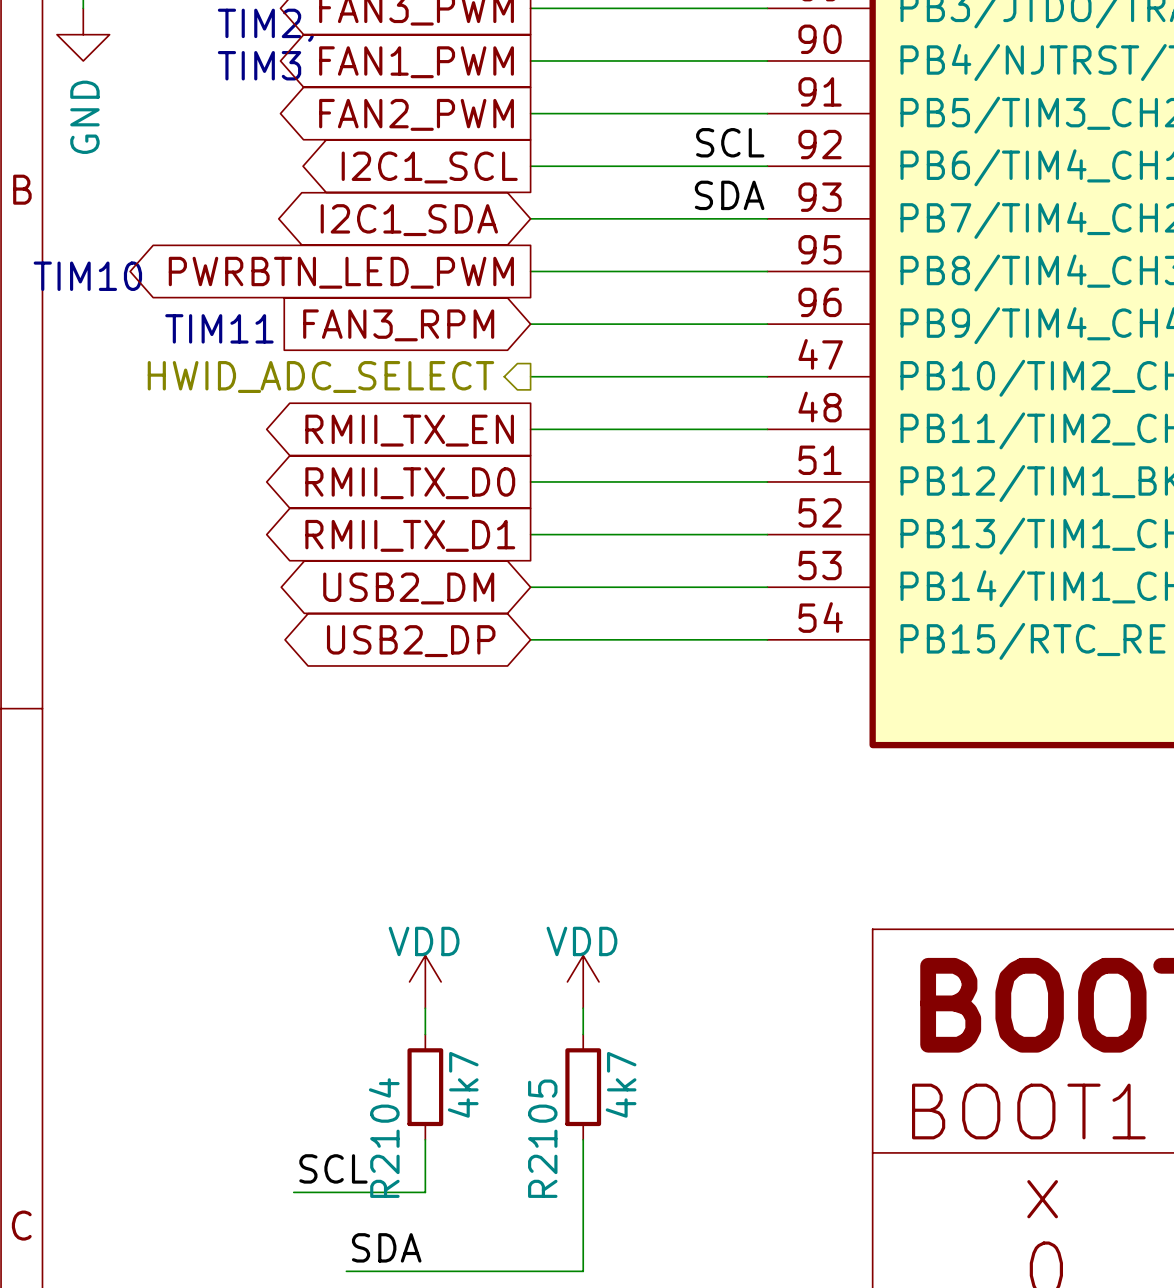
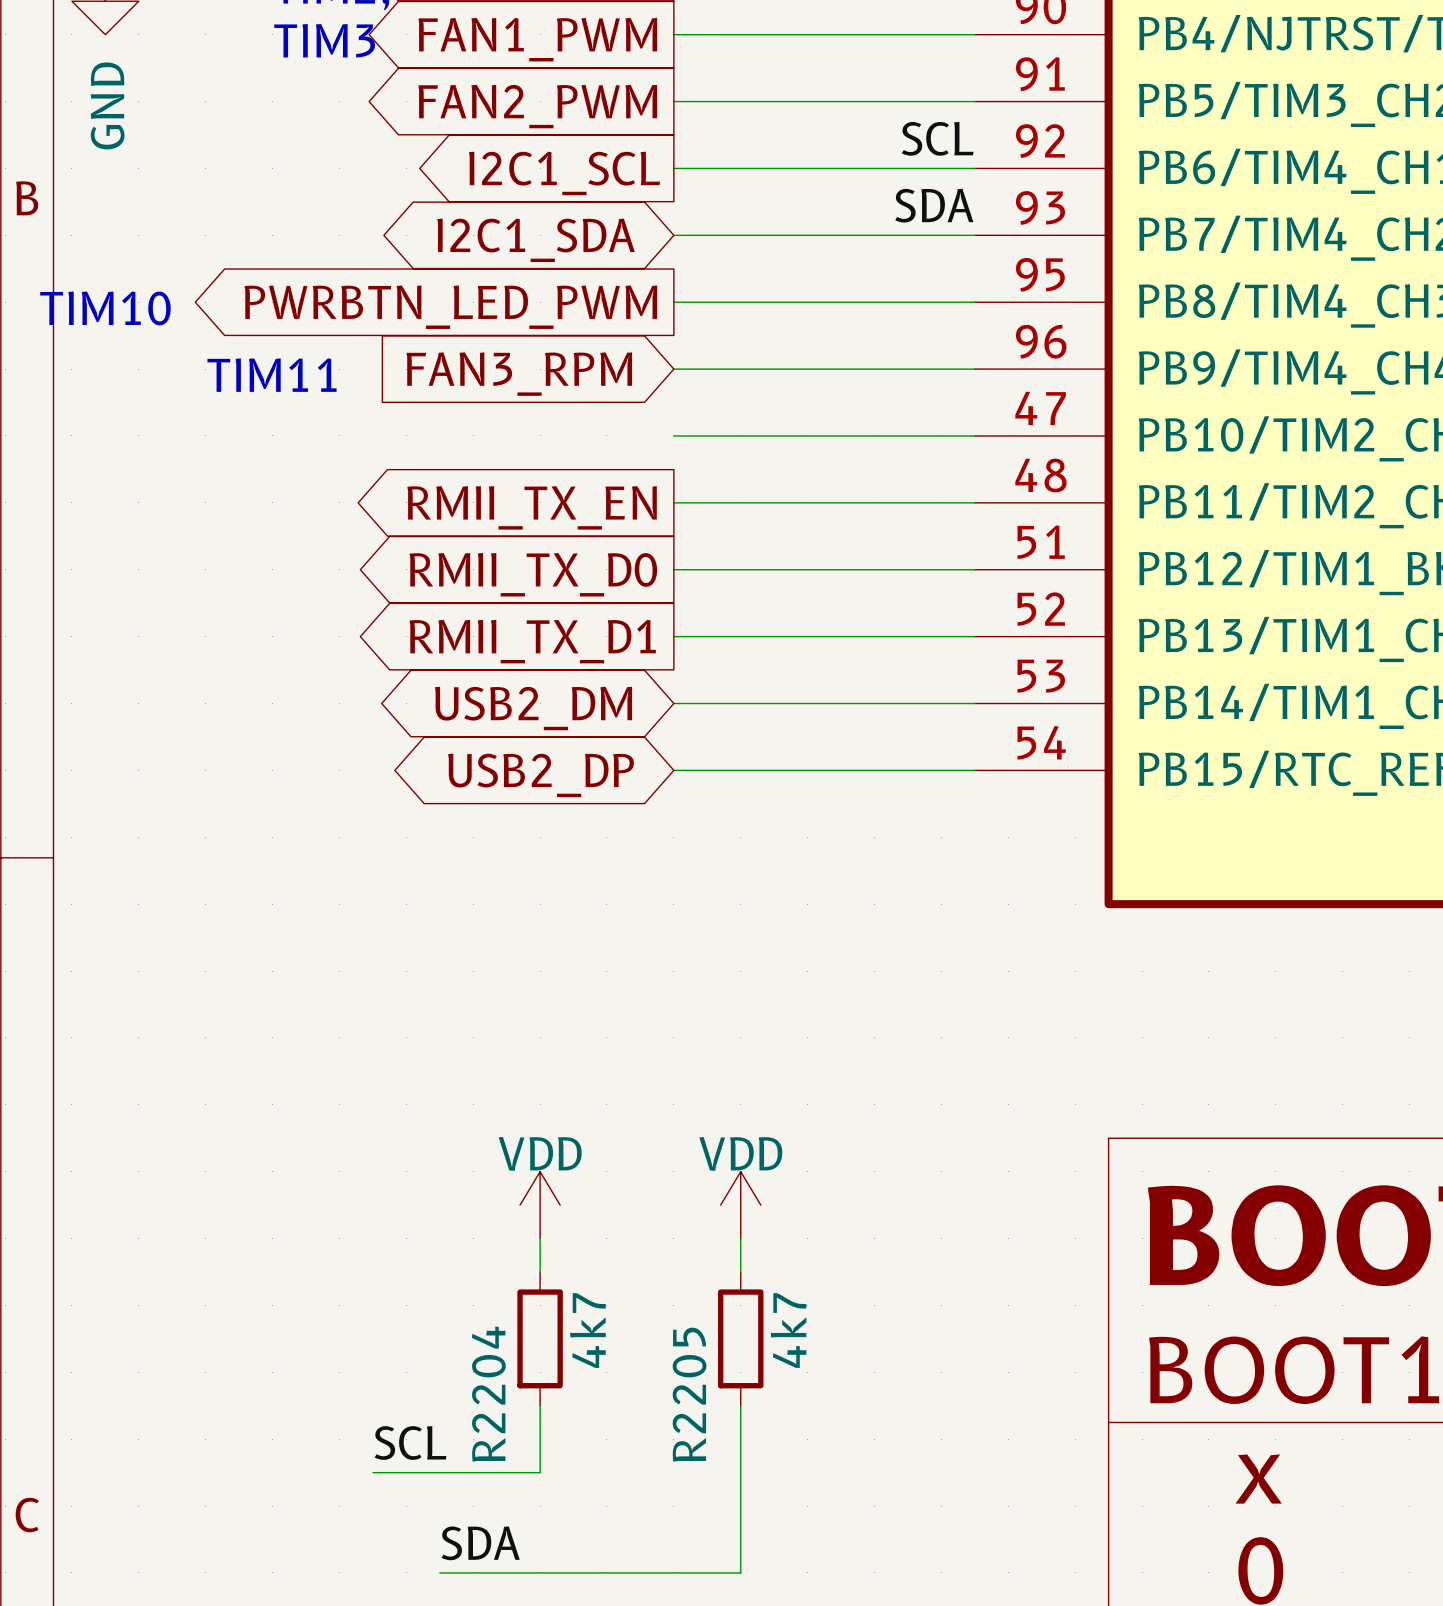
hierarchical label: HWID_ADC_SELECT (320, 377) -> none
R2104 name: R2104 (384, 1138) -> R2204 (488, 1394)
R2105 name: R2105 (542, 1138) -> R2205 (689, 1394)

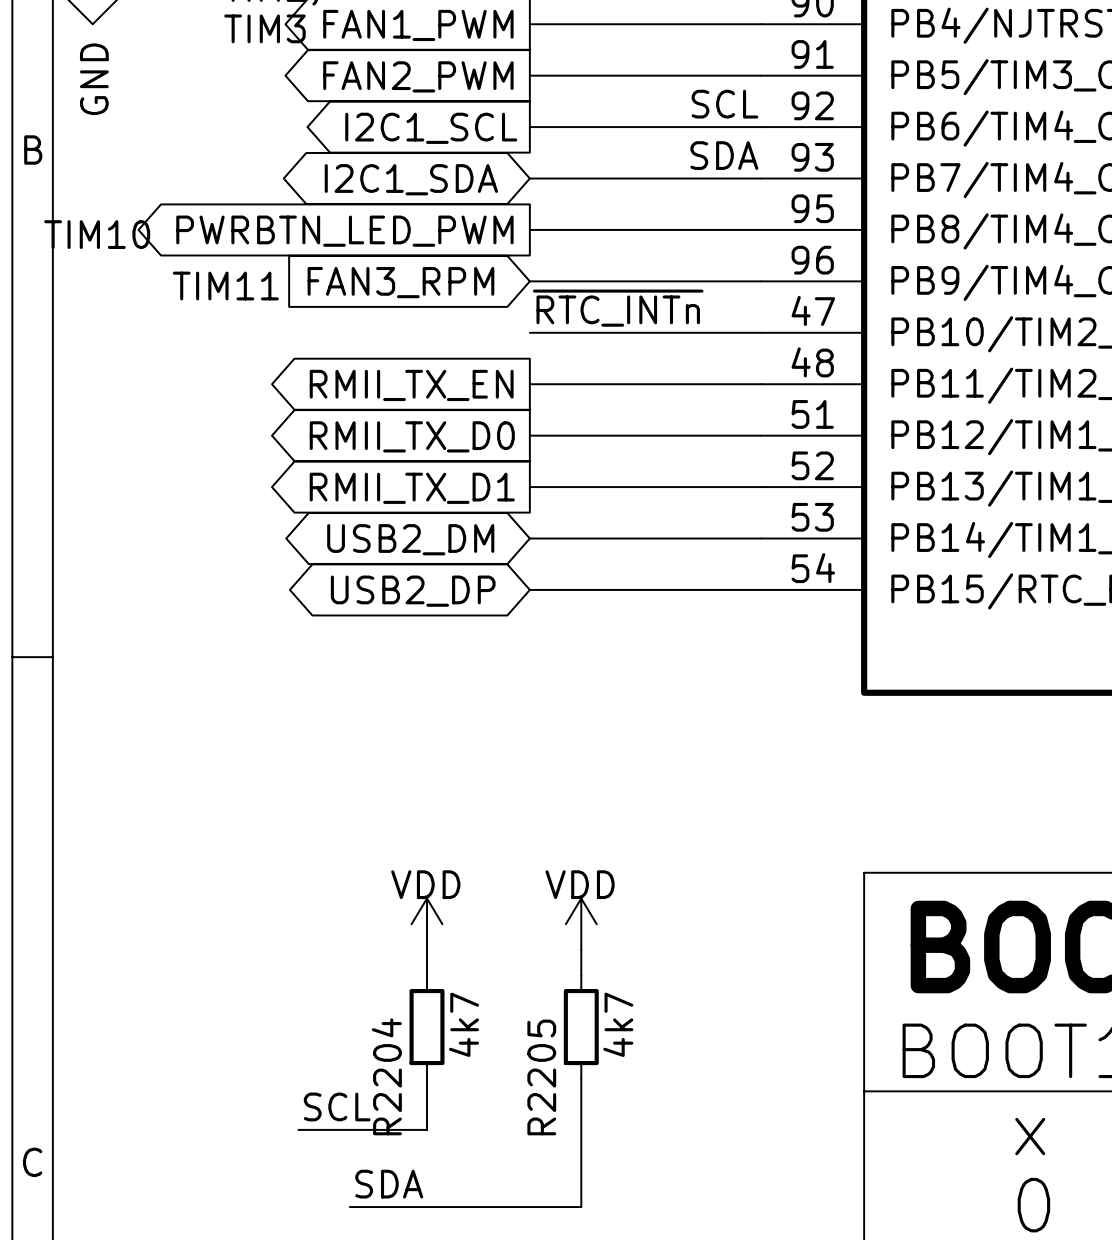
label: none -> ~{RTC_INTn} (618, 308)

